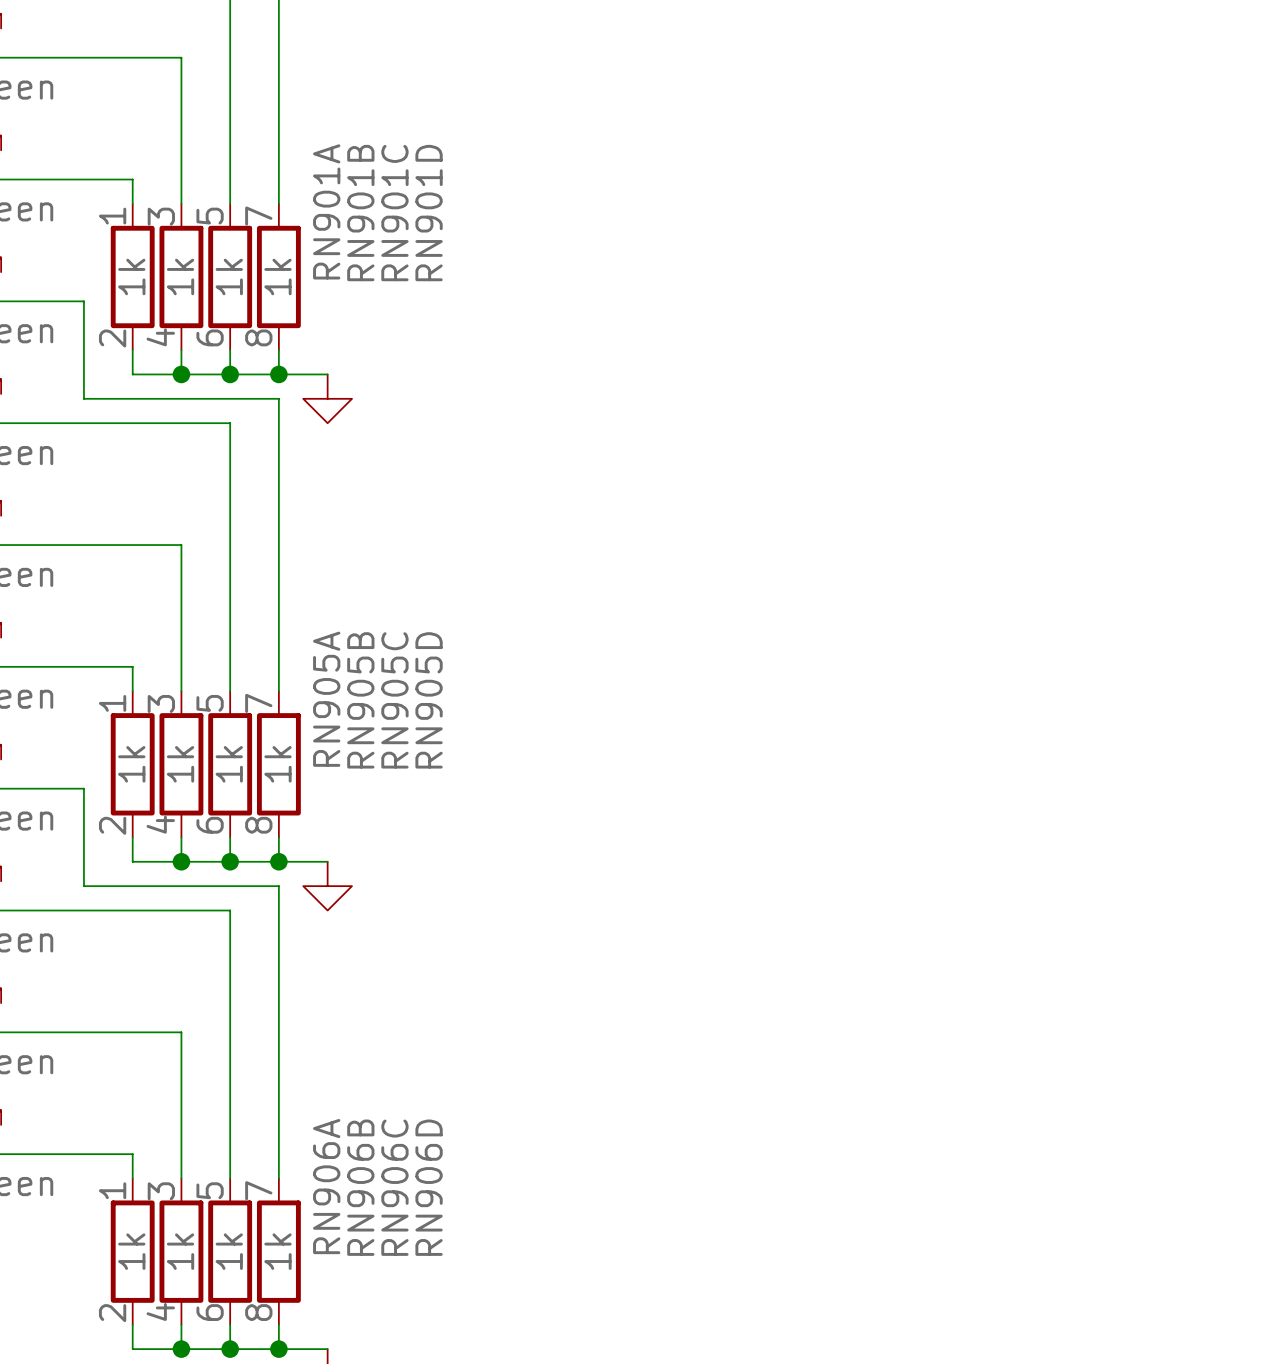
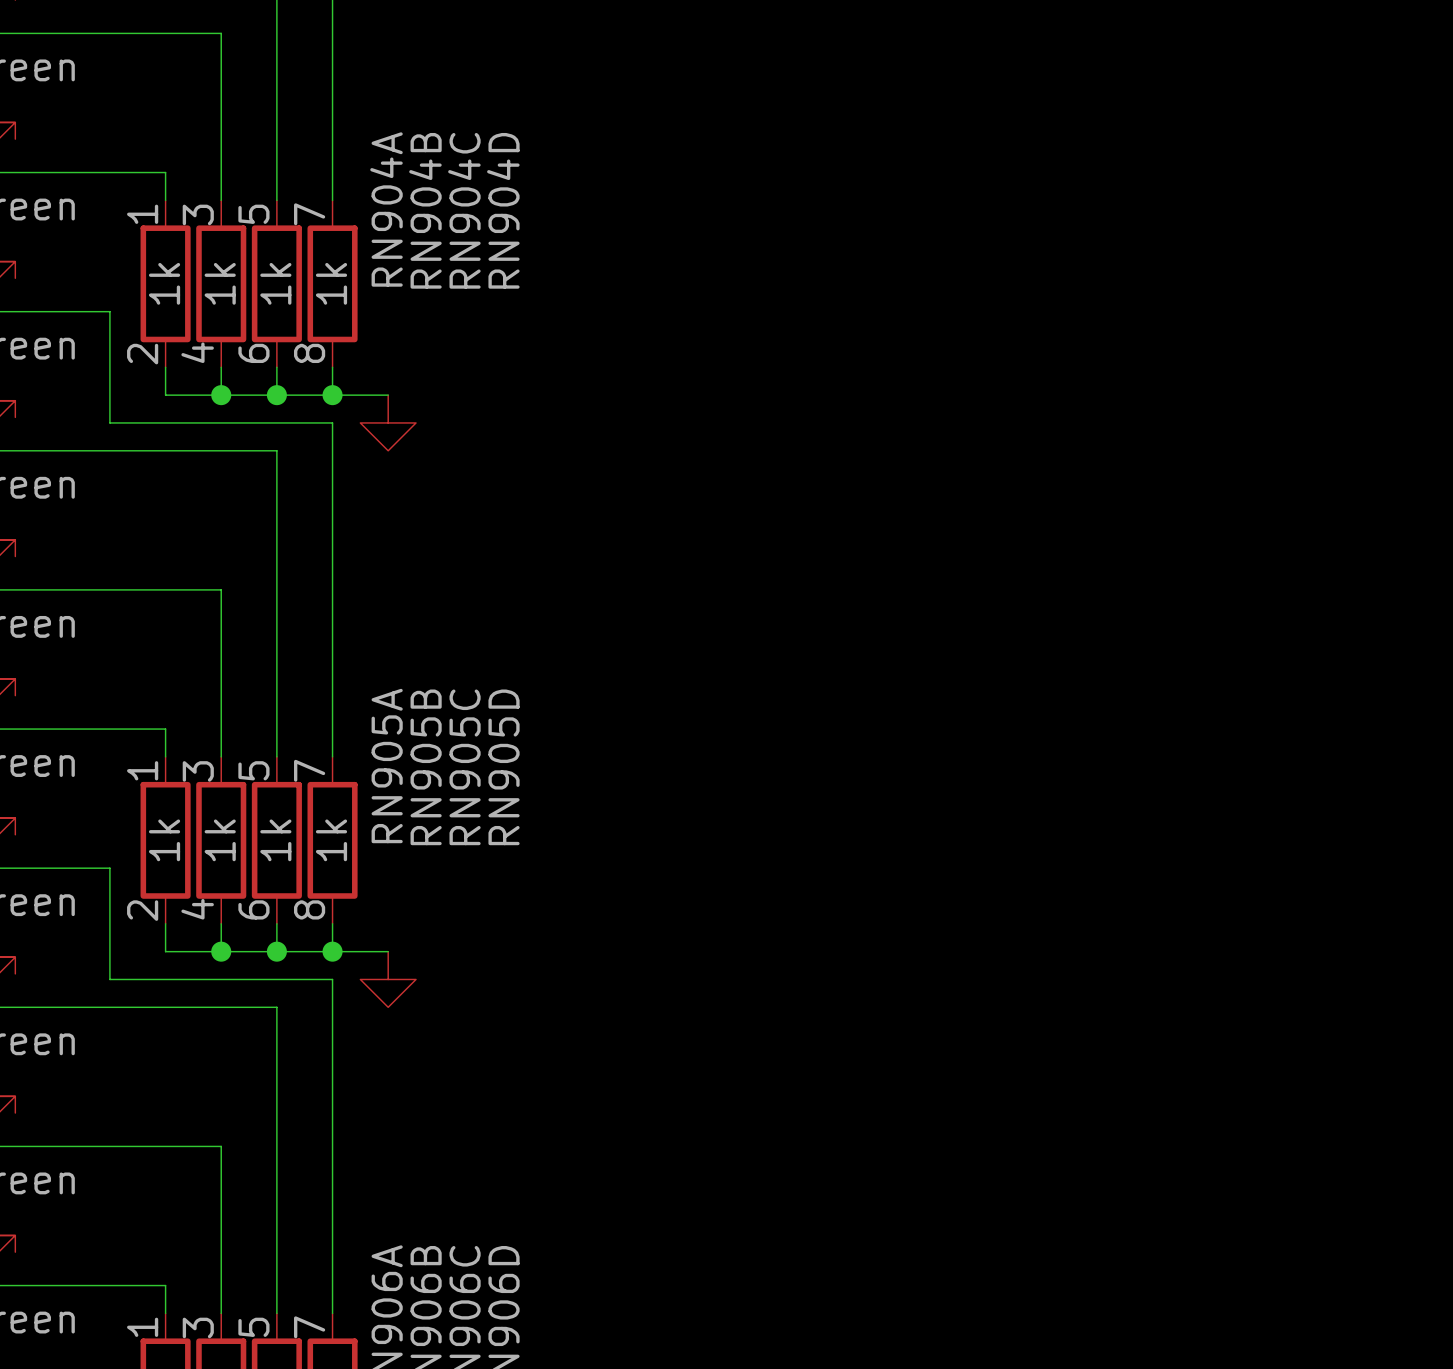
RN901A name: RN901A (326, 211) -> RN904A (386, 209)
RN901B name: RN901B (360, 213) -> RN904B (425, 210)
RN901C name: RN901C (394, 213) -> RN904C (464, 210)
RN901D name: RN901D (429, 213) -> RN904D (503, 210)

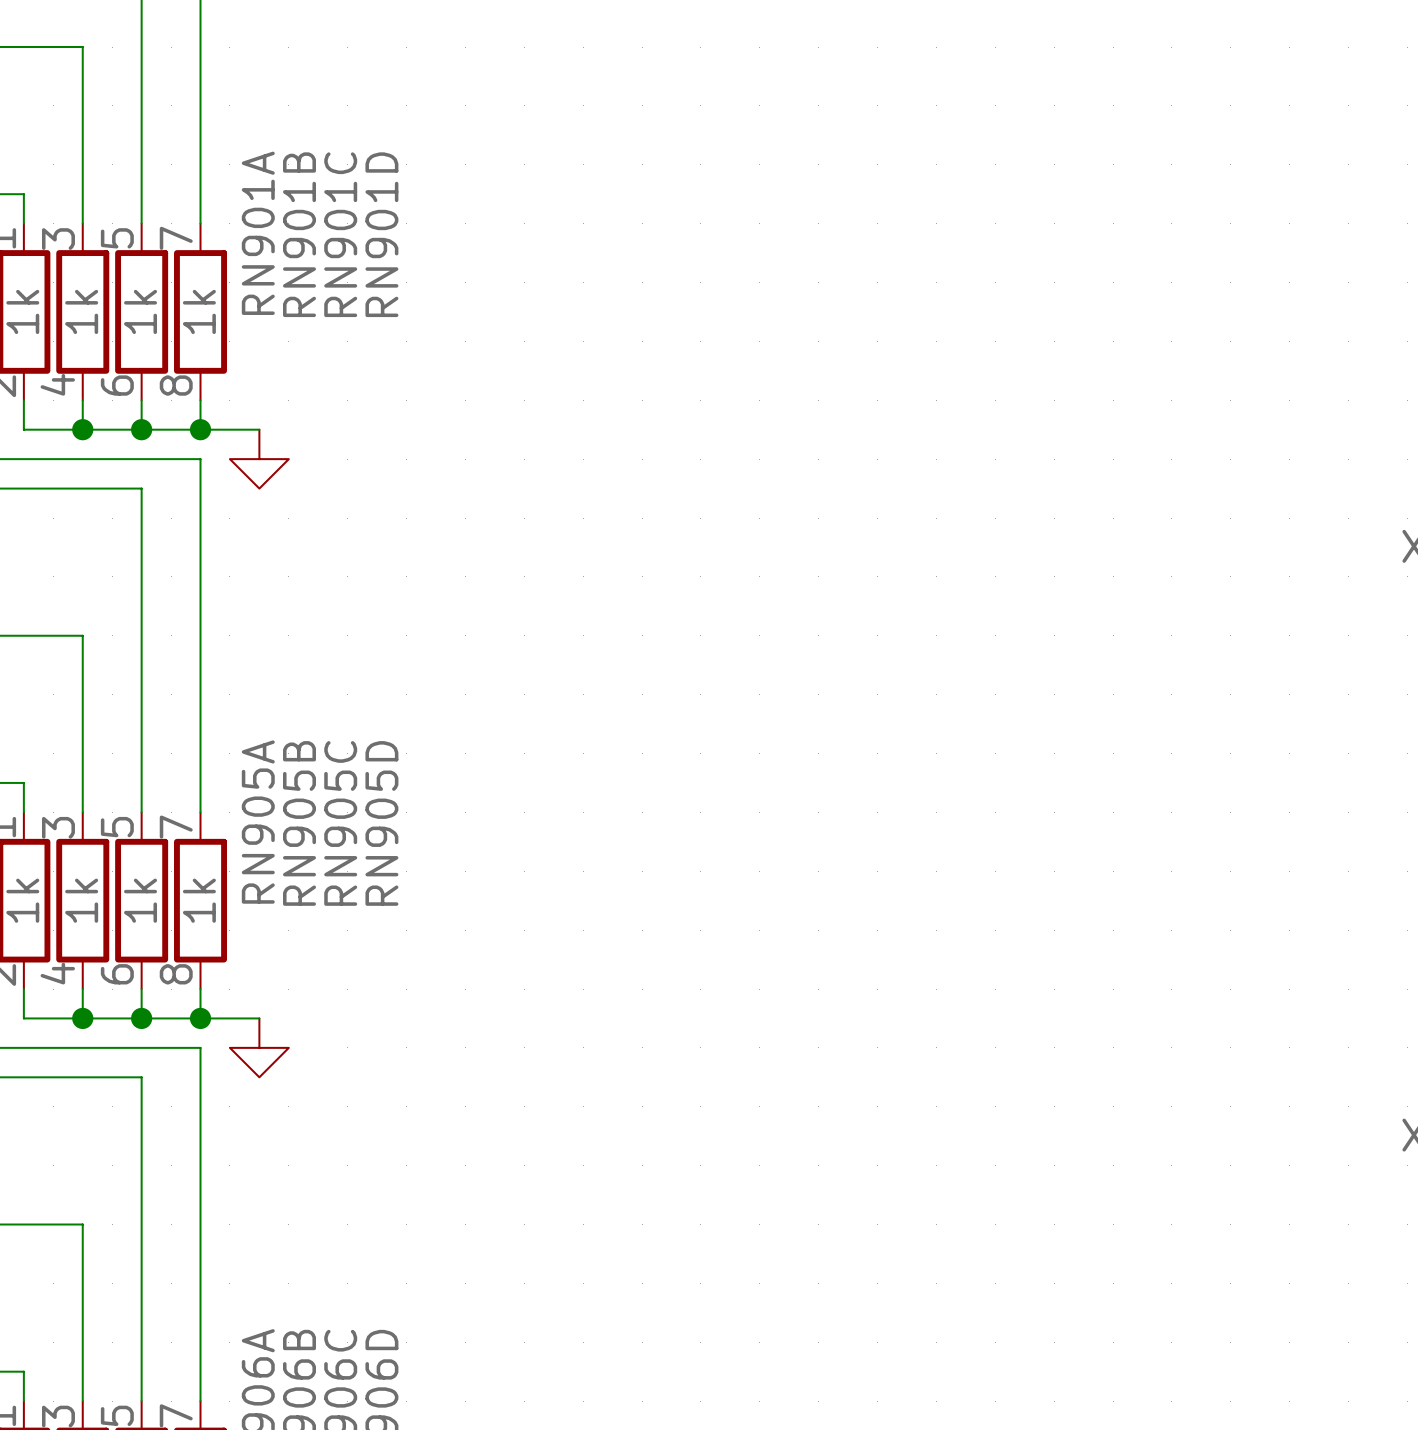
RN904A name: RN904A (386, 209) -> RN901A (258, 233)
RN904B name: RN904B (425, 210) -> RN901B (299, 234)
RN904C name: RN904C (464, 210) -> RN901C (340, 234)
RN904D name: RN904D (503, 210) -> RN901D (381, 234)

